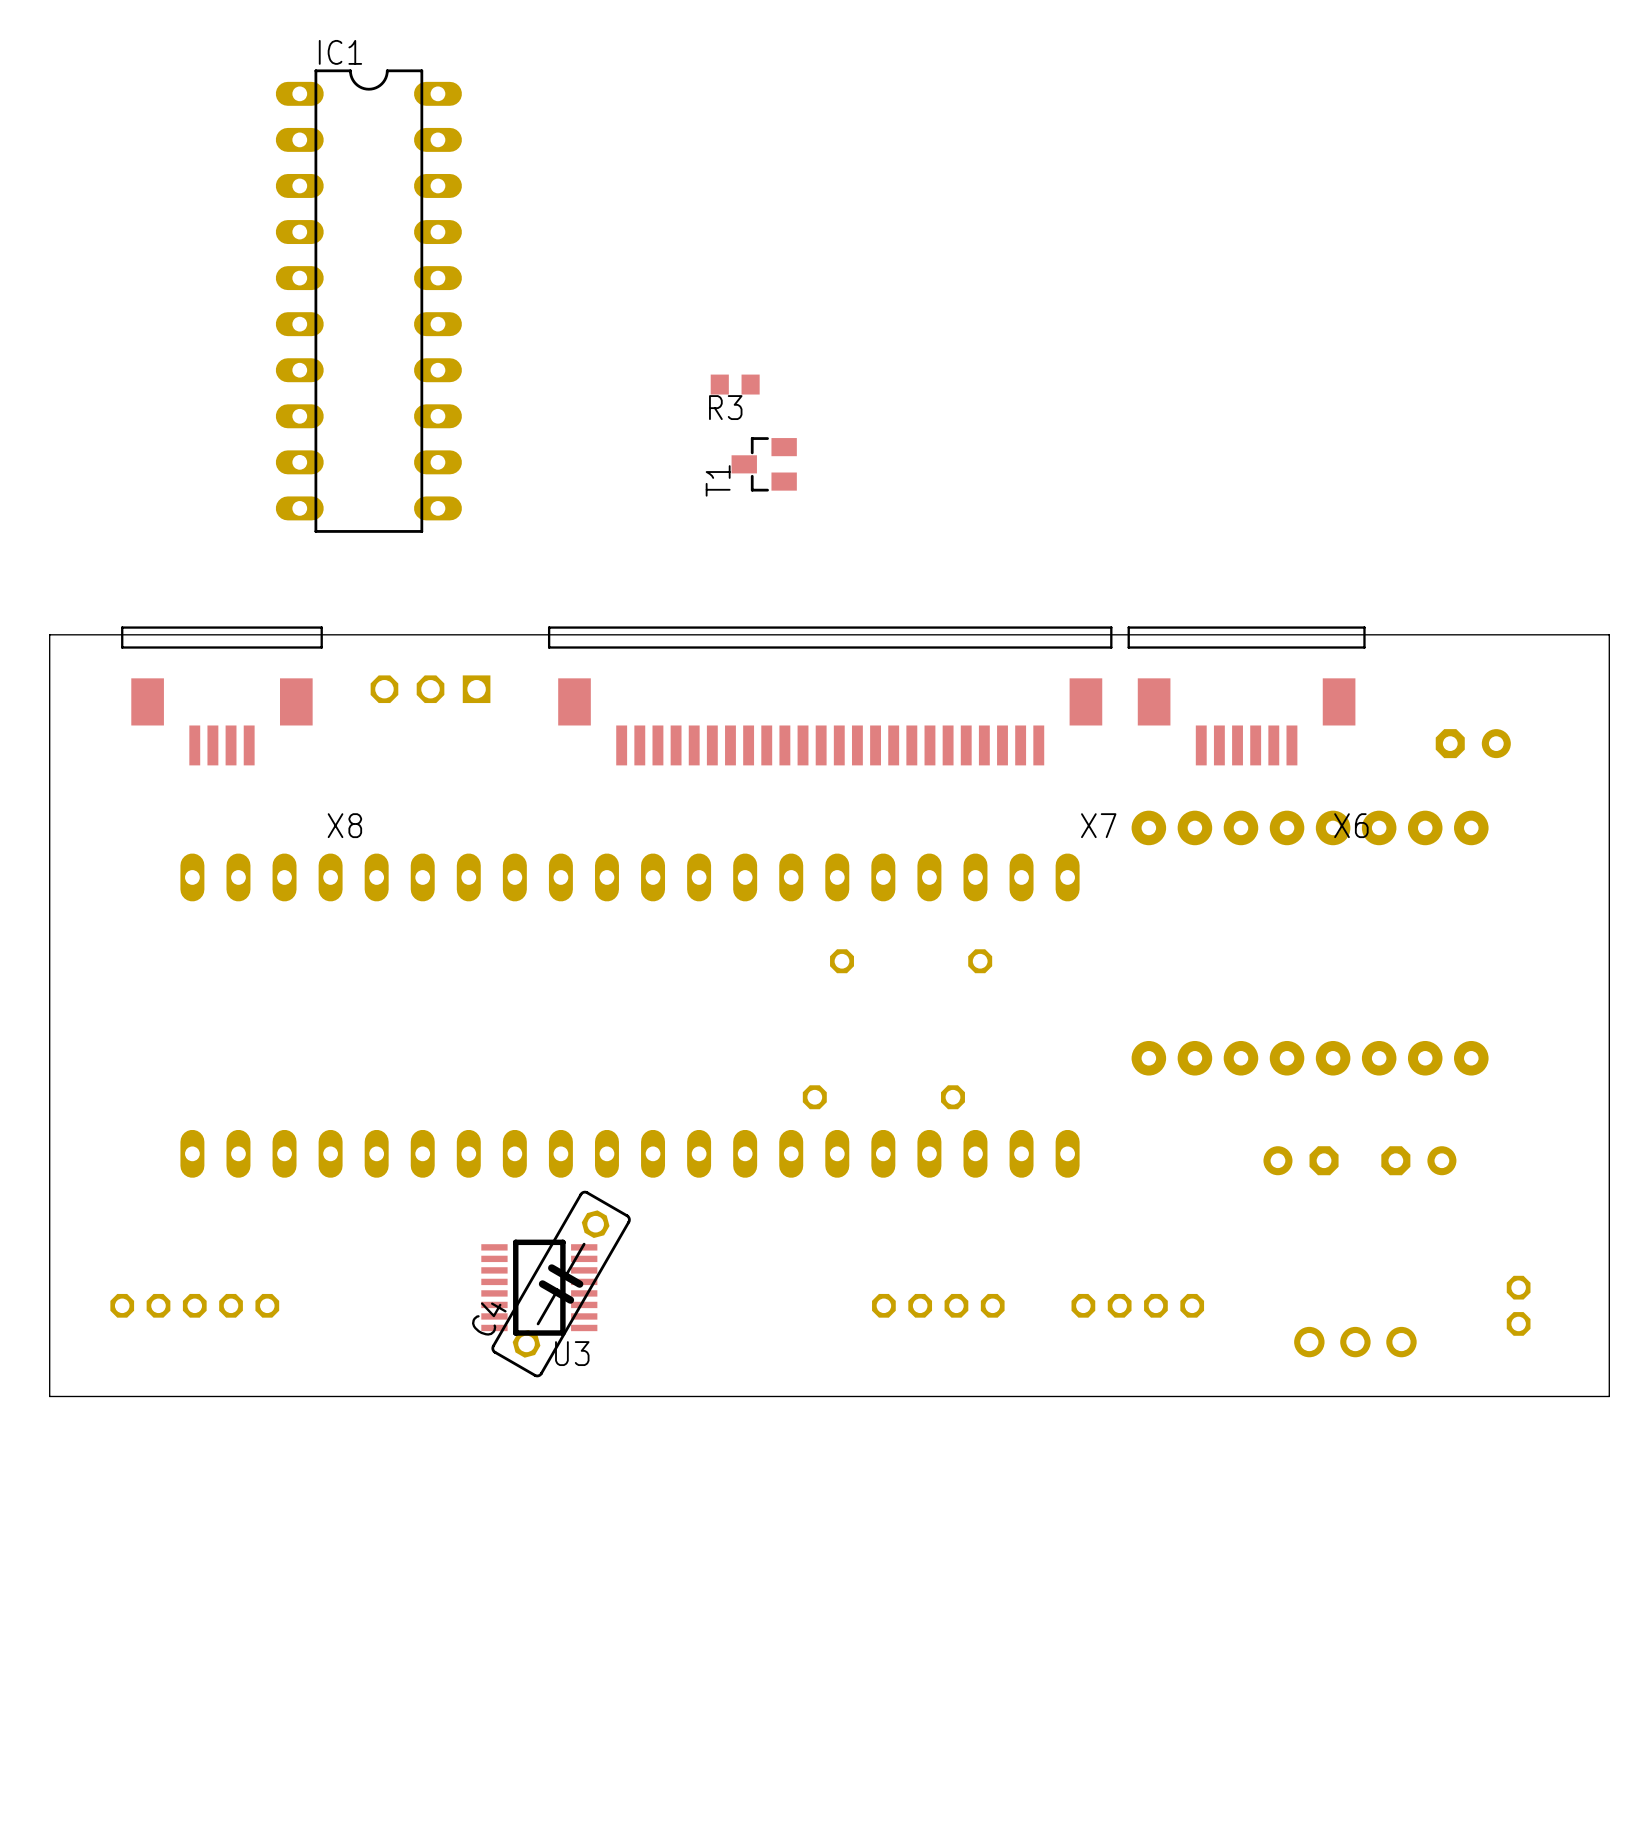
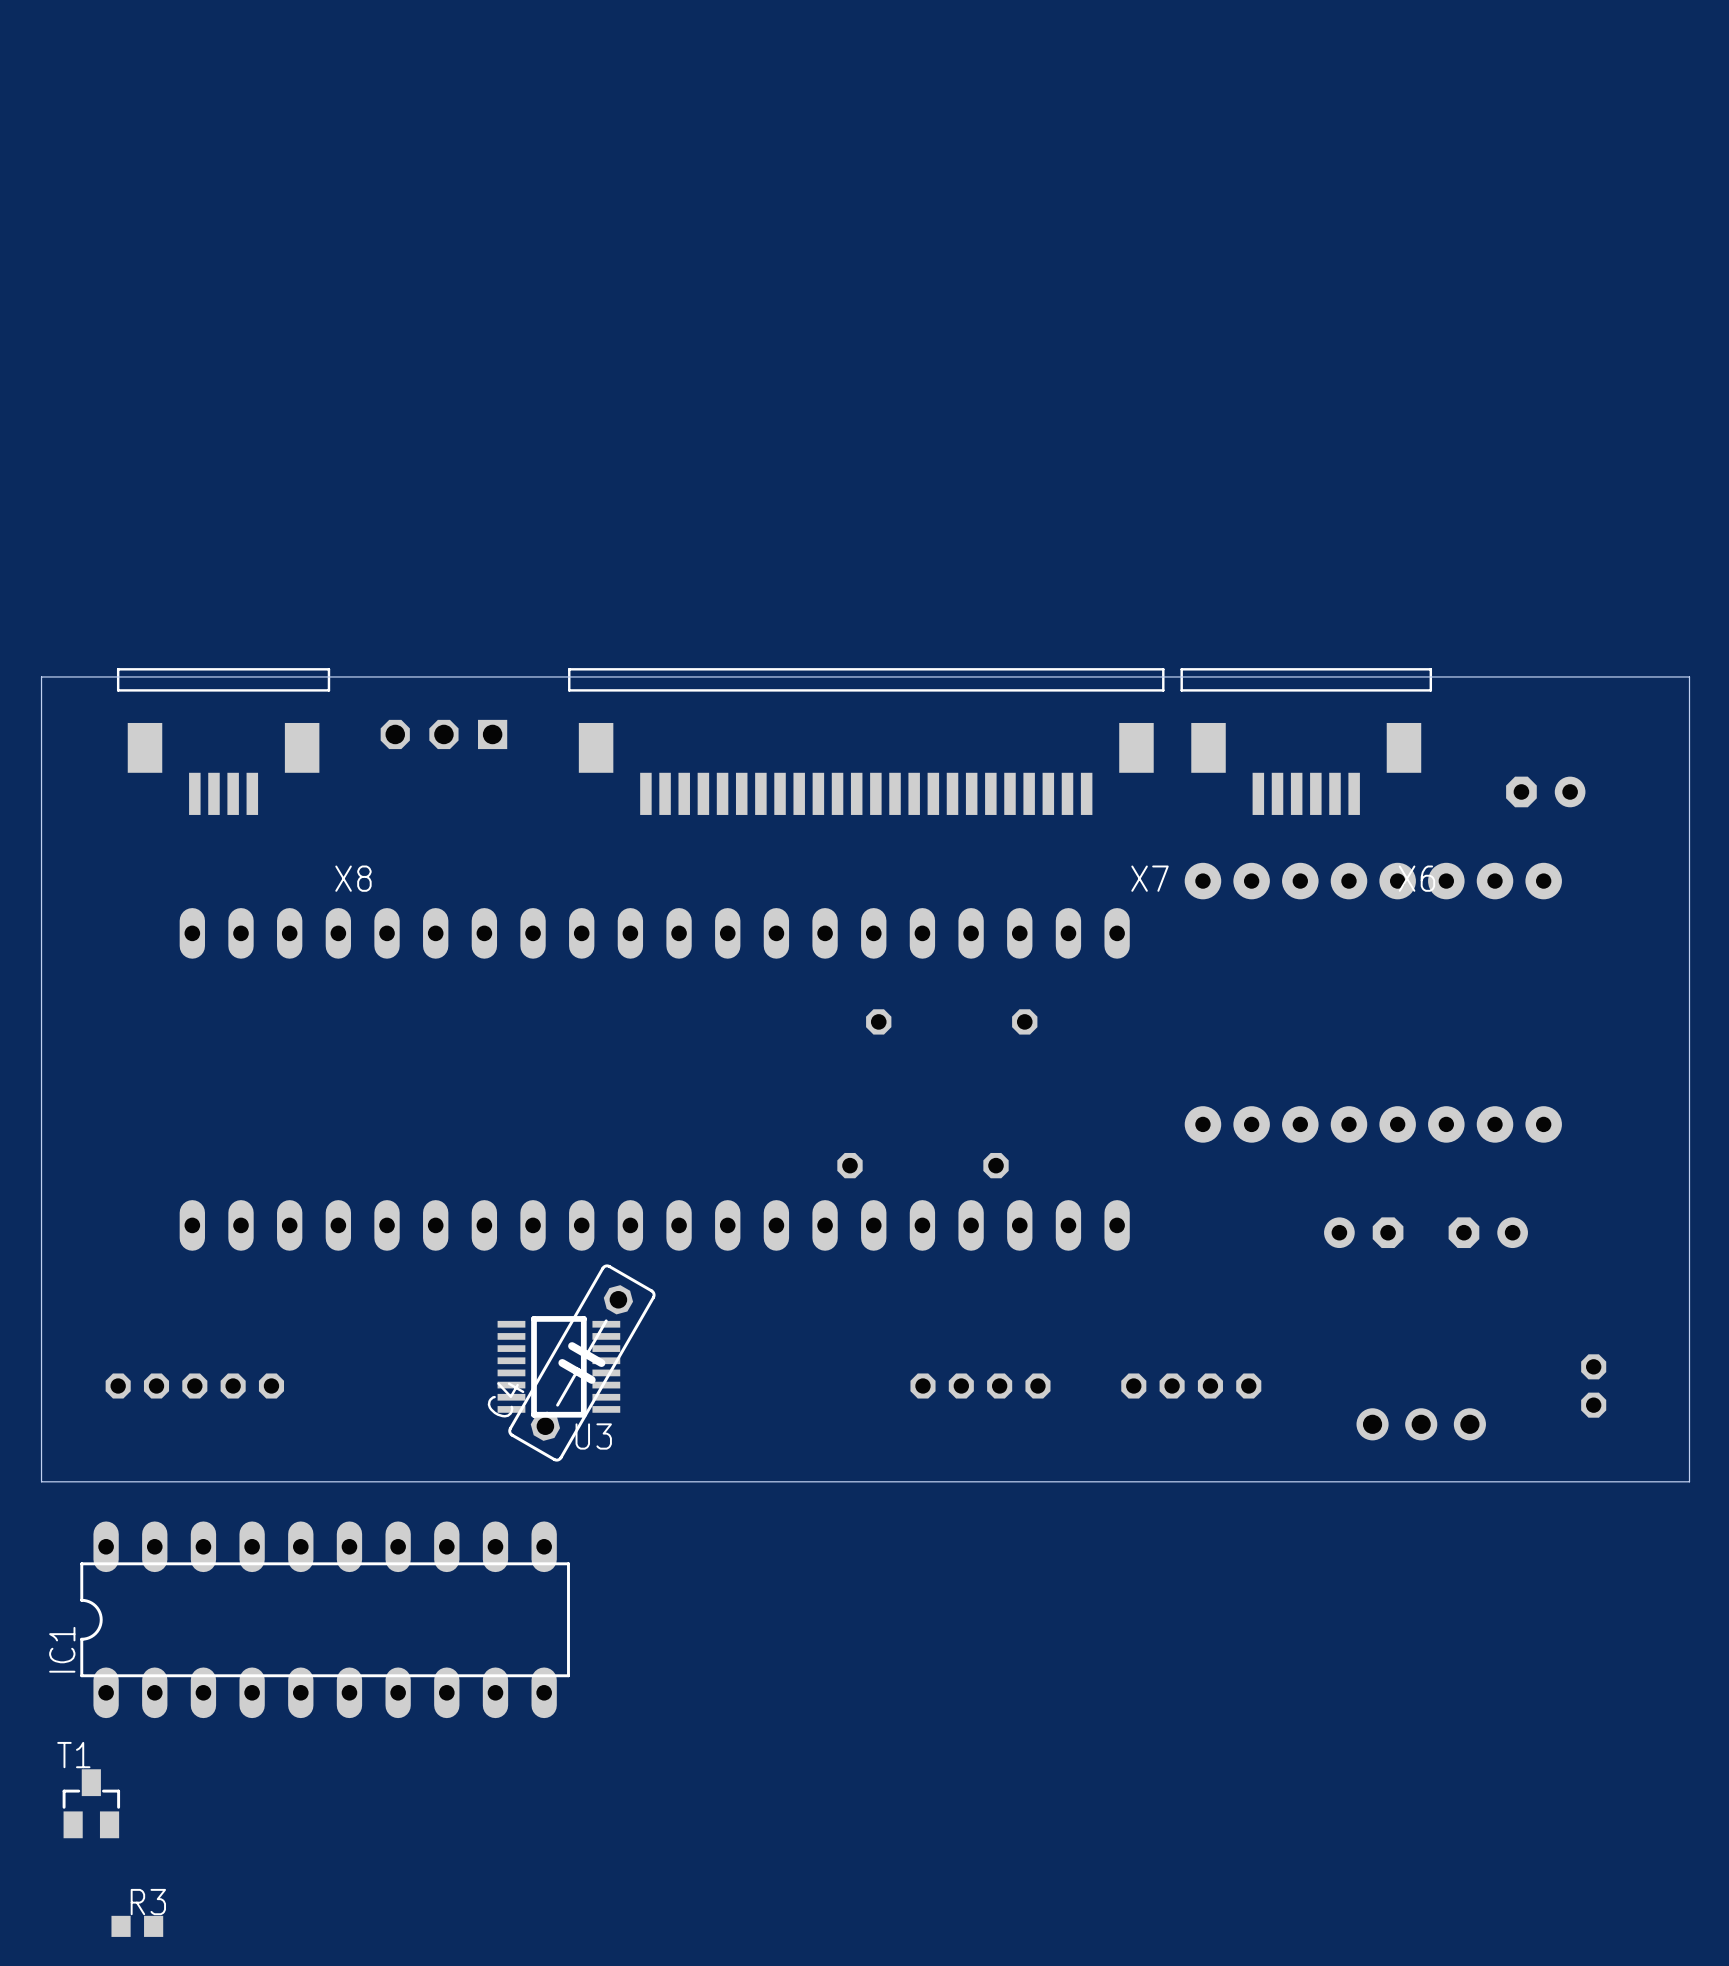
IC1 rotation: 0° (368, 301) -> 90° counterclockwise (325, 1619)
IC1 position: (368, 301) -> (325, 1619)
R3 position: (735, 384) -> (137, 1926)
R3 name position: R3 (725, 407) -> R3 (148, 1902)
T1 rotation: 0° (764, 464) -> 90° clockwise (91, 1803)
T1 position: (764, 464) -> (91, 1803)

